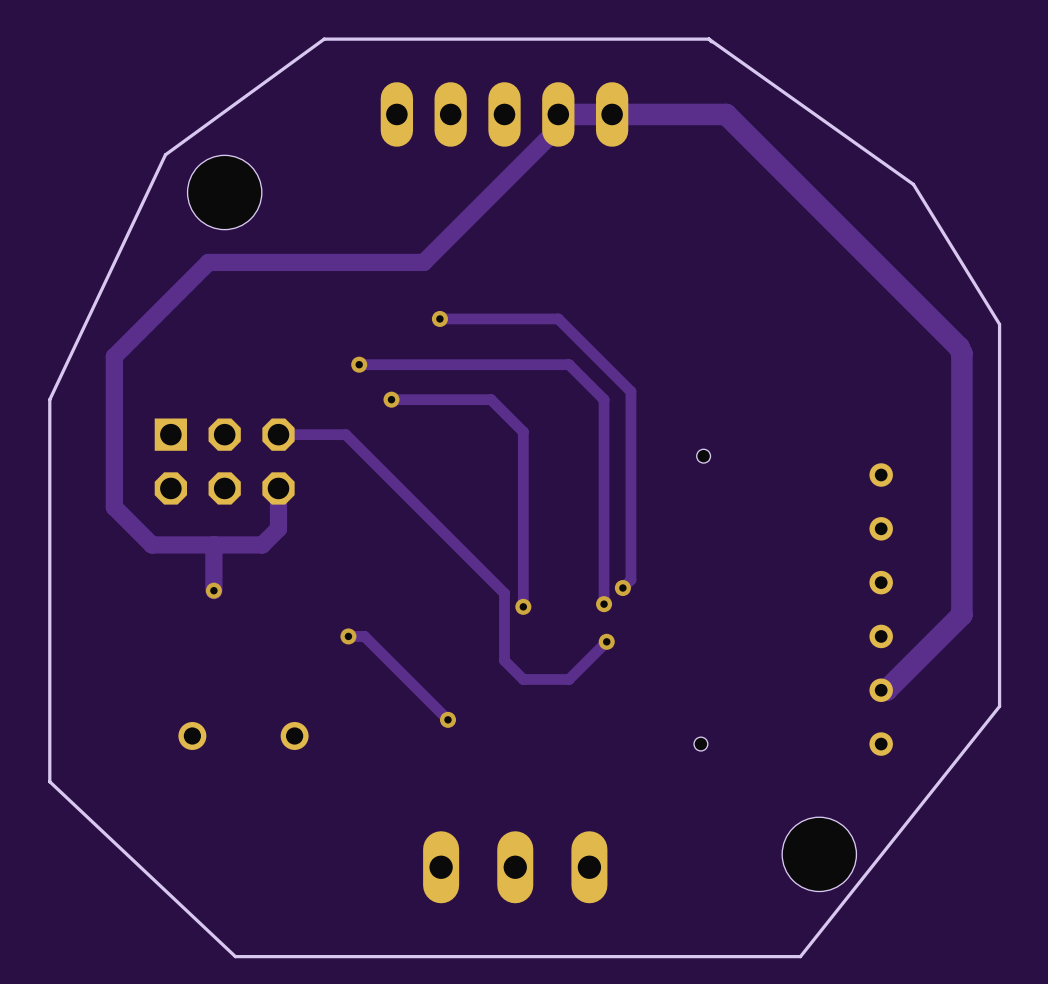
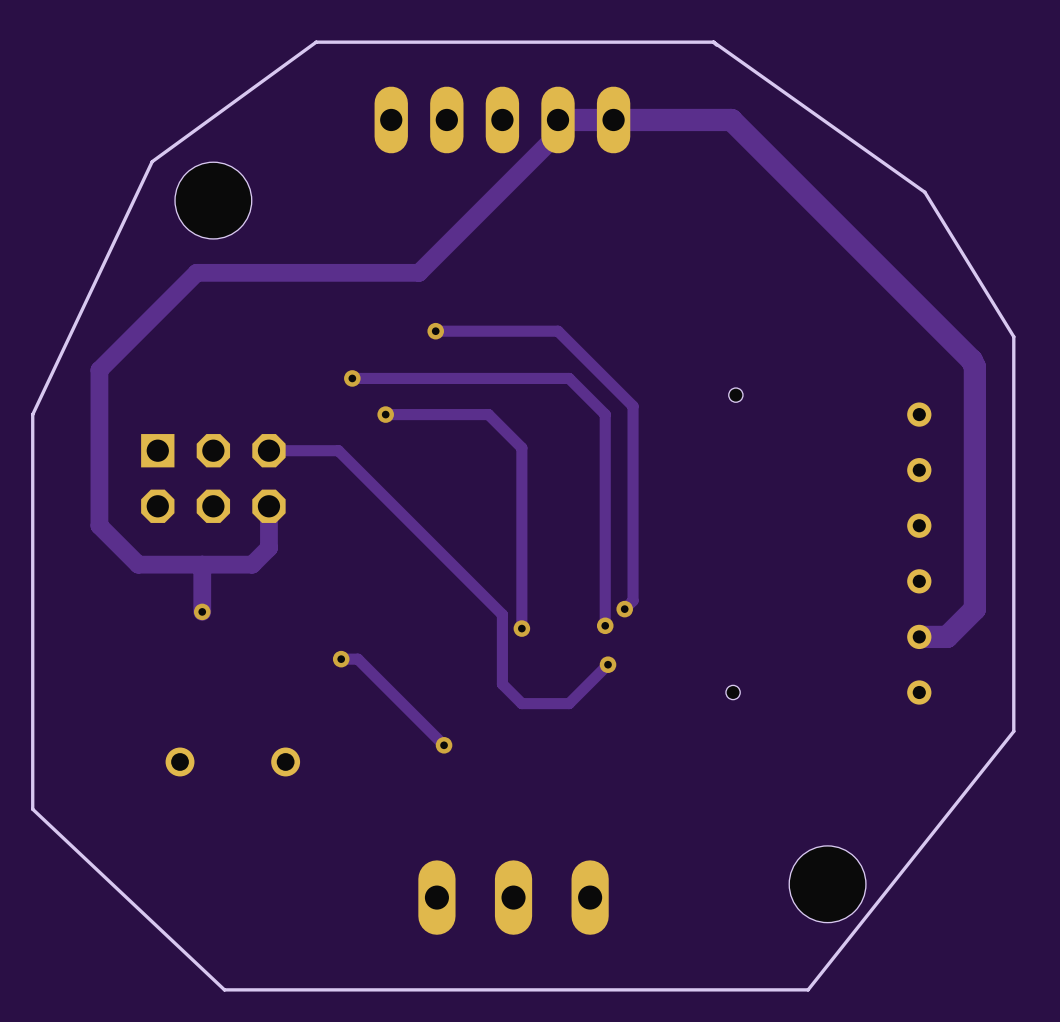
hole position: (703, 456) -> (735, 395)
track: (961, 588) (961, 614) (886, 690) (881, 690) -> (974, 609) (947, 636) (919, 636)
part position: (881, 609) -> (919, 553)
hole position: (700, 744) -> (733, 692)

